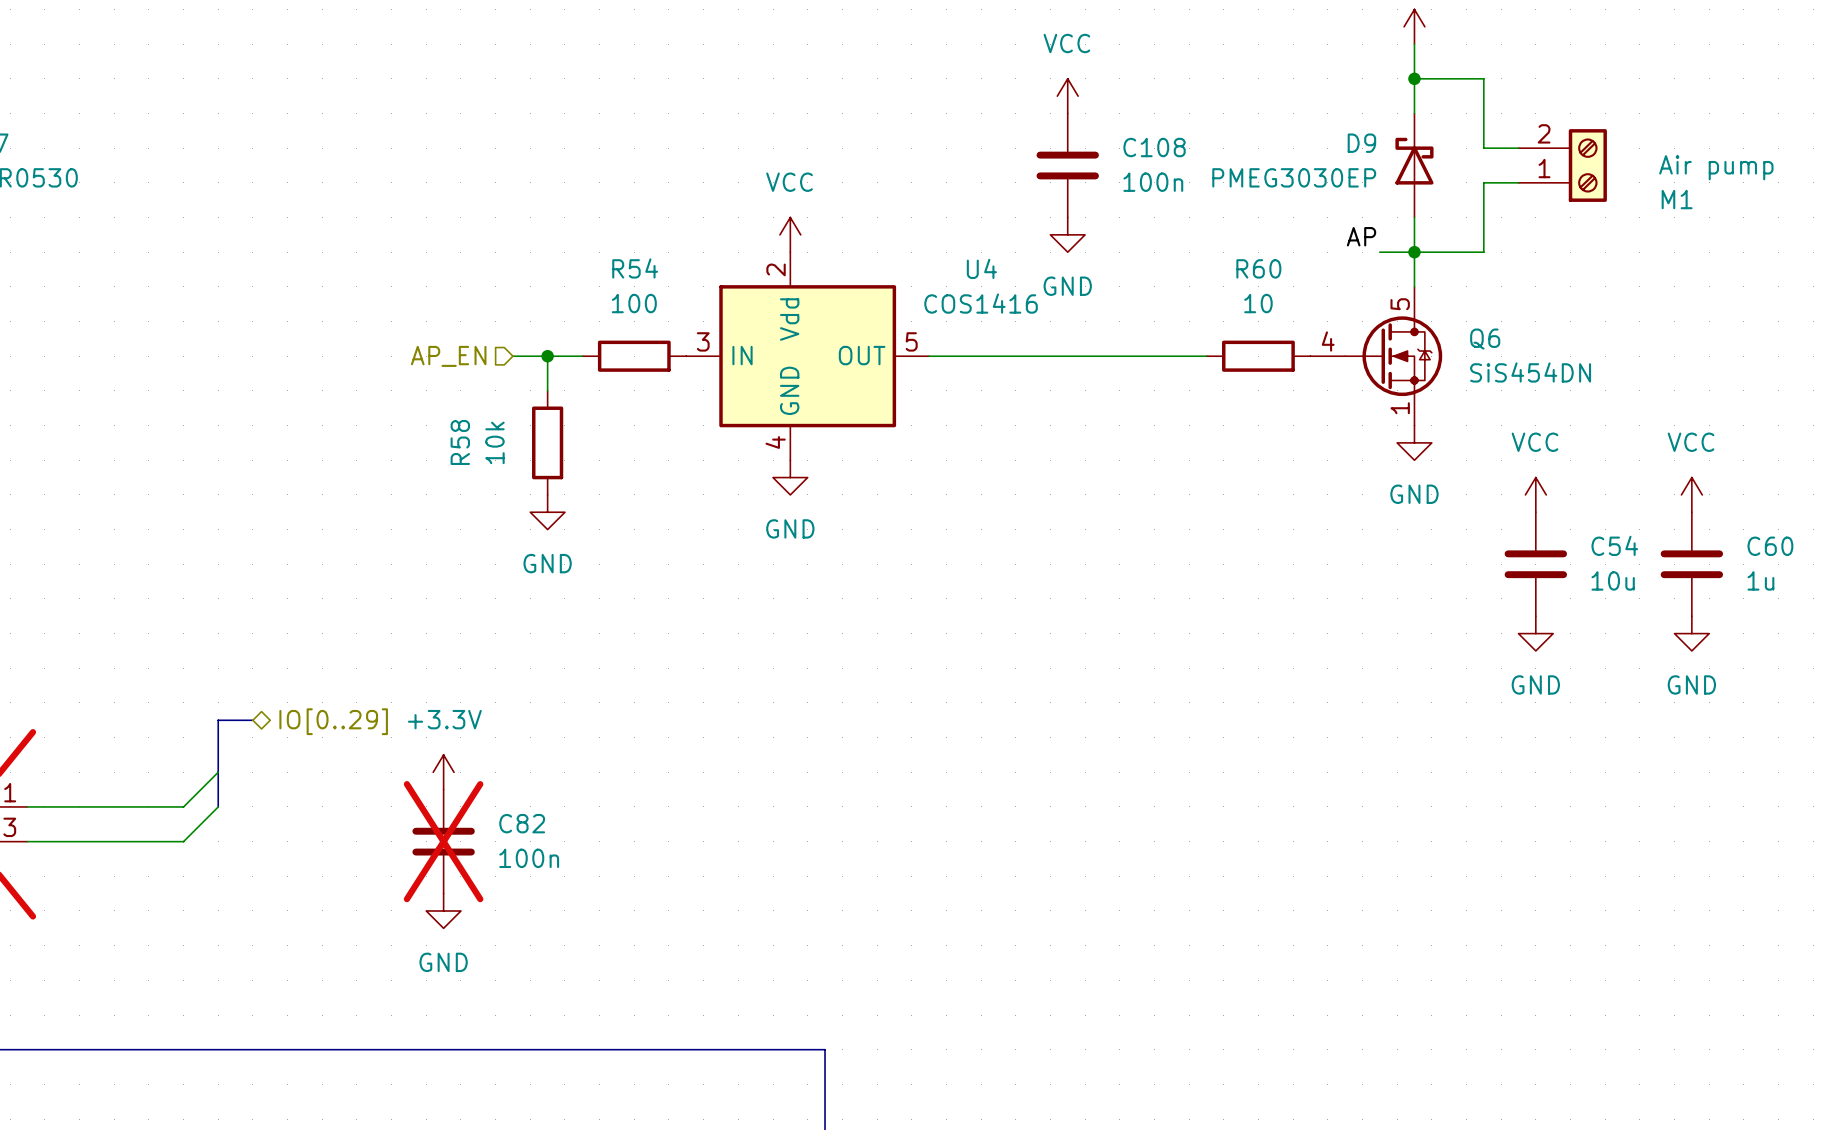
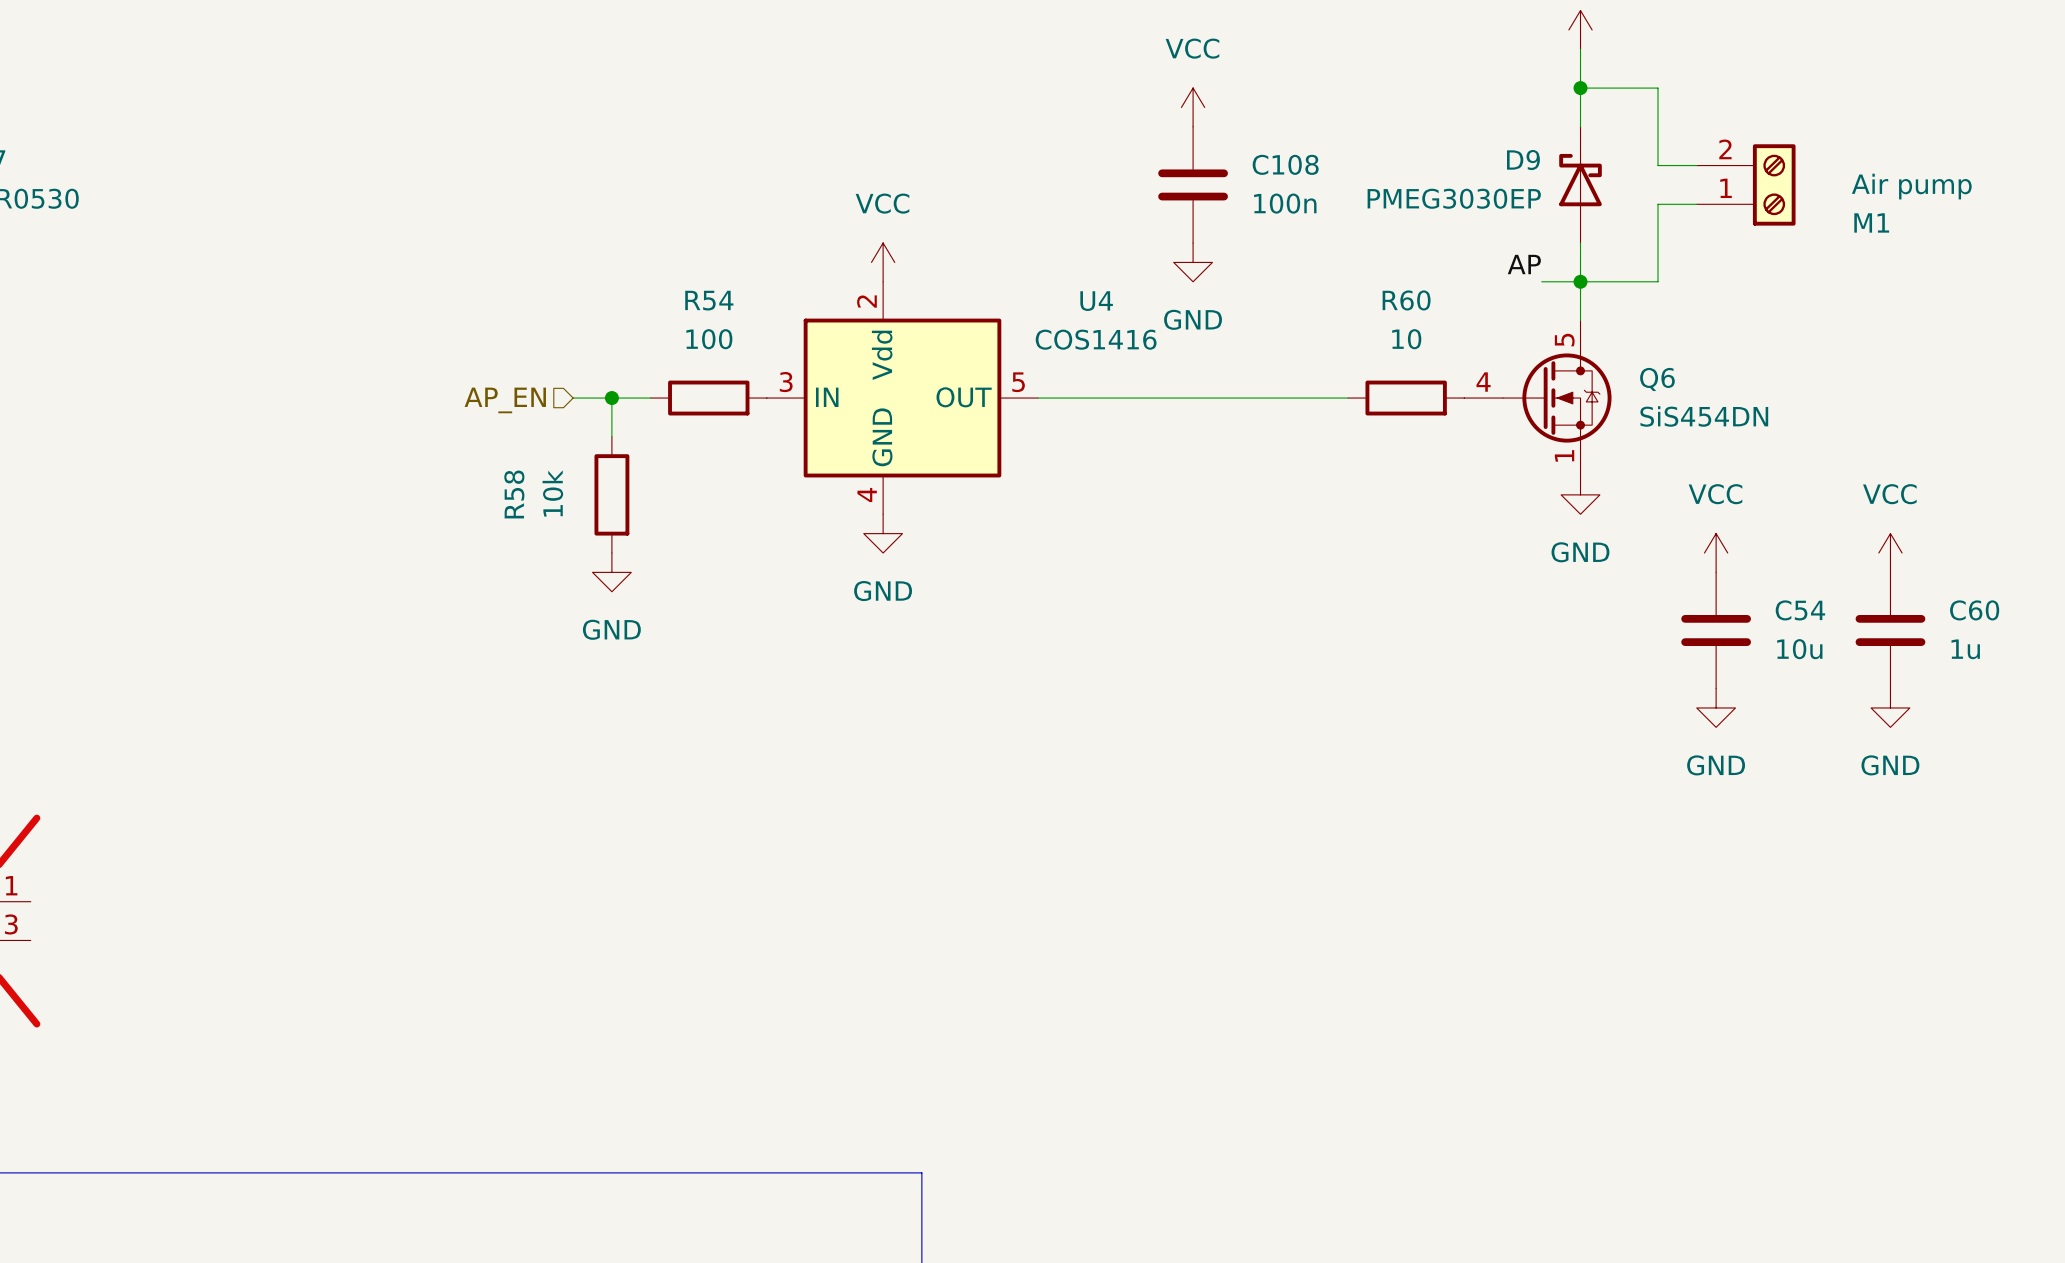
bus: (252, 720) (218, 720) (218, 806) -> none
hierarchical label: IO[0..29] (333, 721) -> none
wire: (218, 772) (183, 806) (27, 806) -> none
power symbol: +3.3V (443, 772) -> none
wire: (218, 806) (183, 841) (27, 841) -> none
C82: 100n (443, 841) -> none
power symbol: GND (443, 910) -> none

